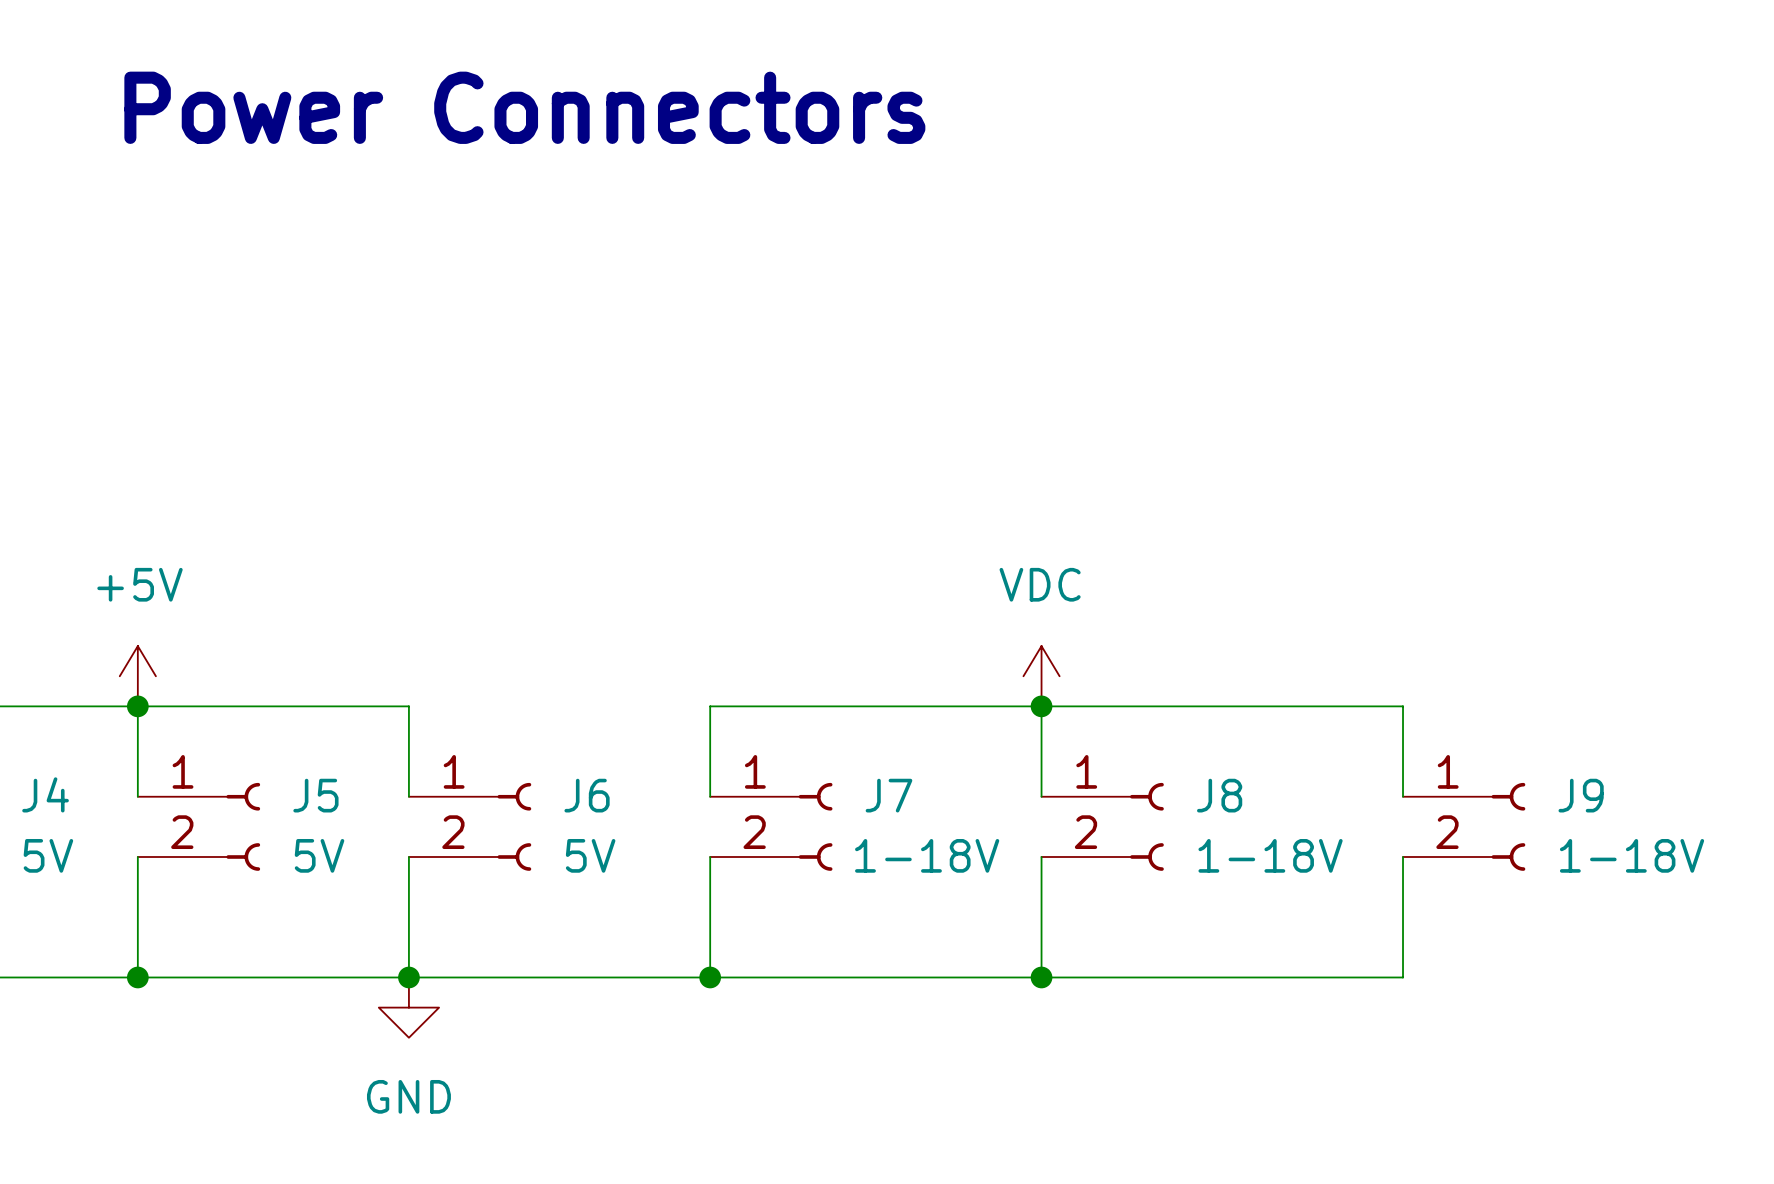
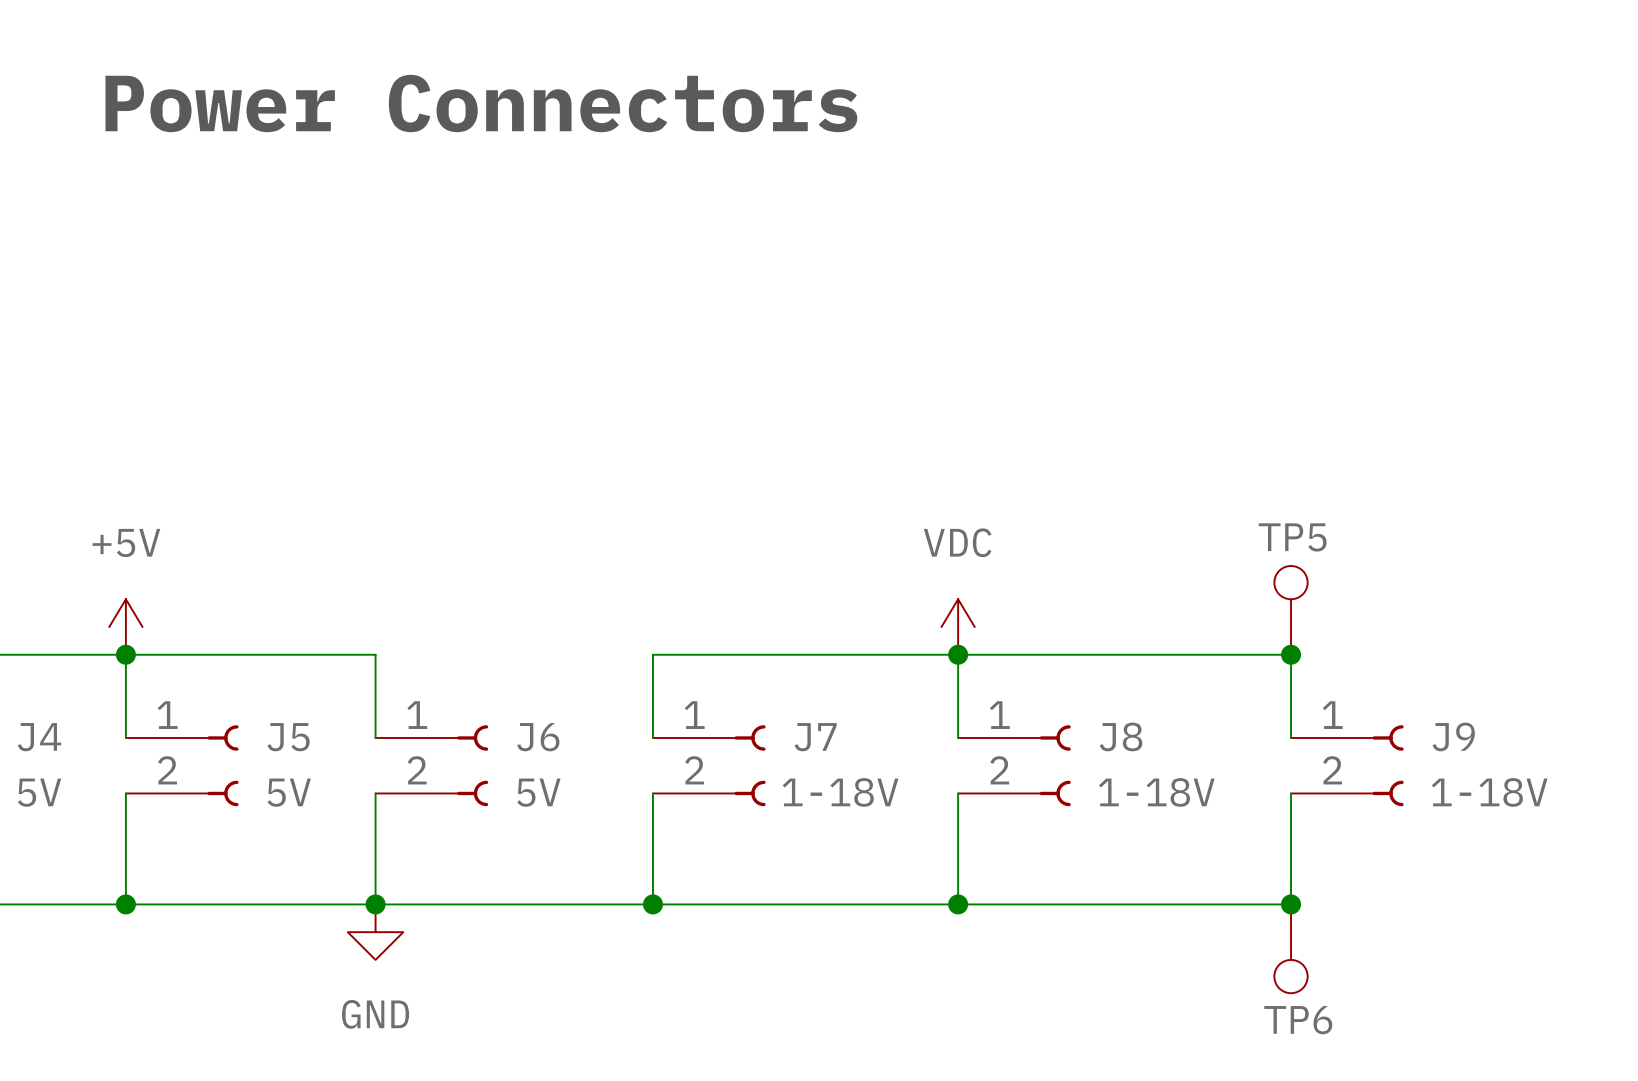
TP5: none -> (1291, 610)
junction: none -> (1291, 654)
junction: none -> (1291, 904)
TP6: none -> (1291, 948)

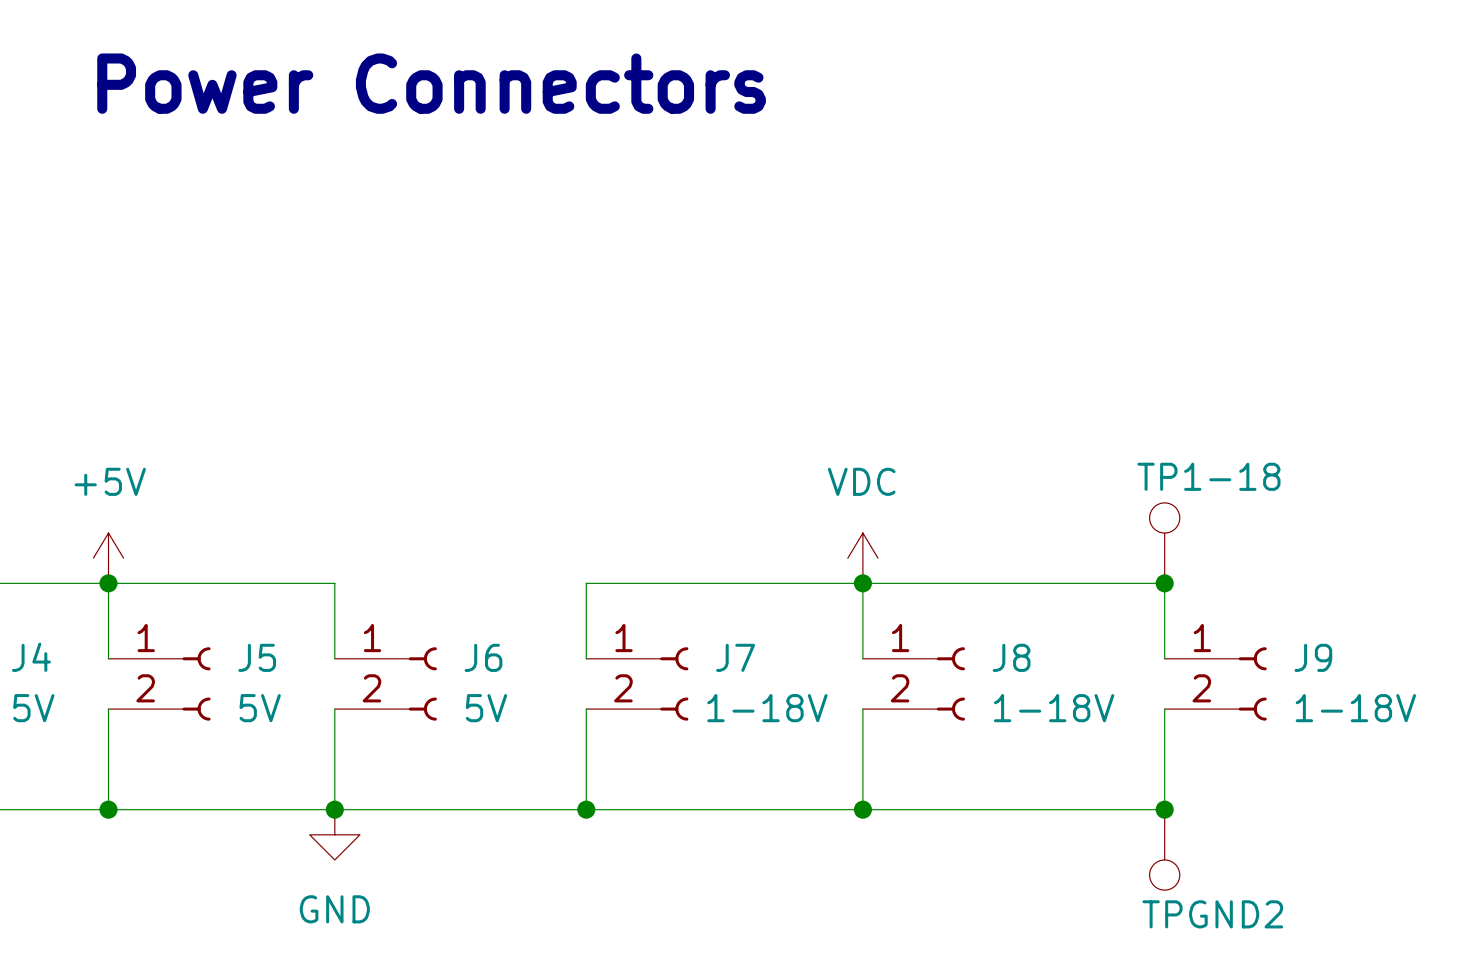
TP5 name: TP5 (1292, 537) -> TP1-18 (1208, 476)
TP6 name: TP6 (1298, 1020) -> TPGND2 (1212, 914)

